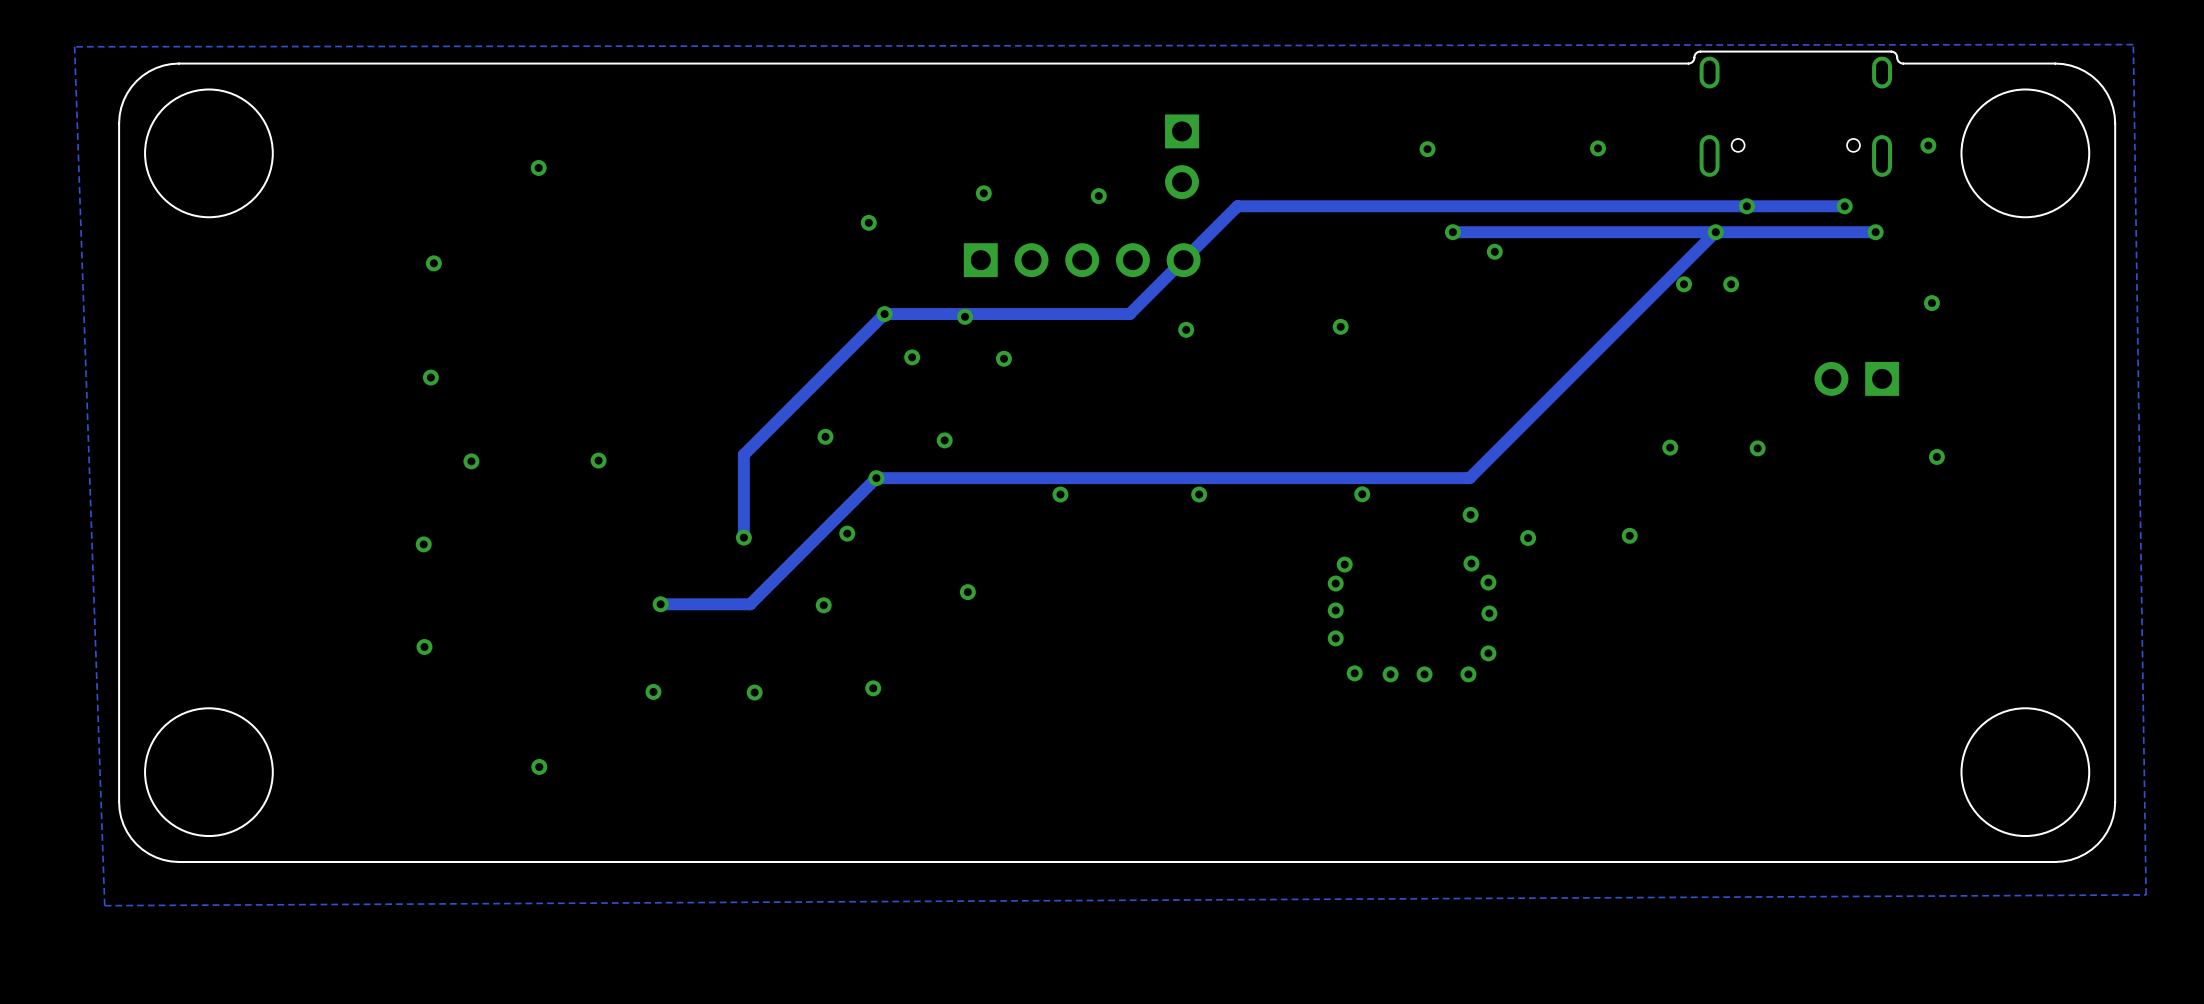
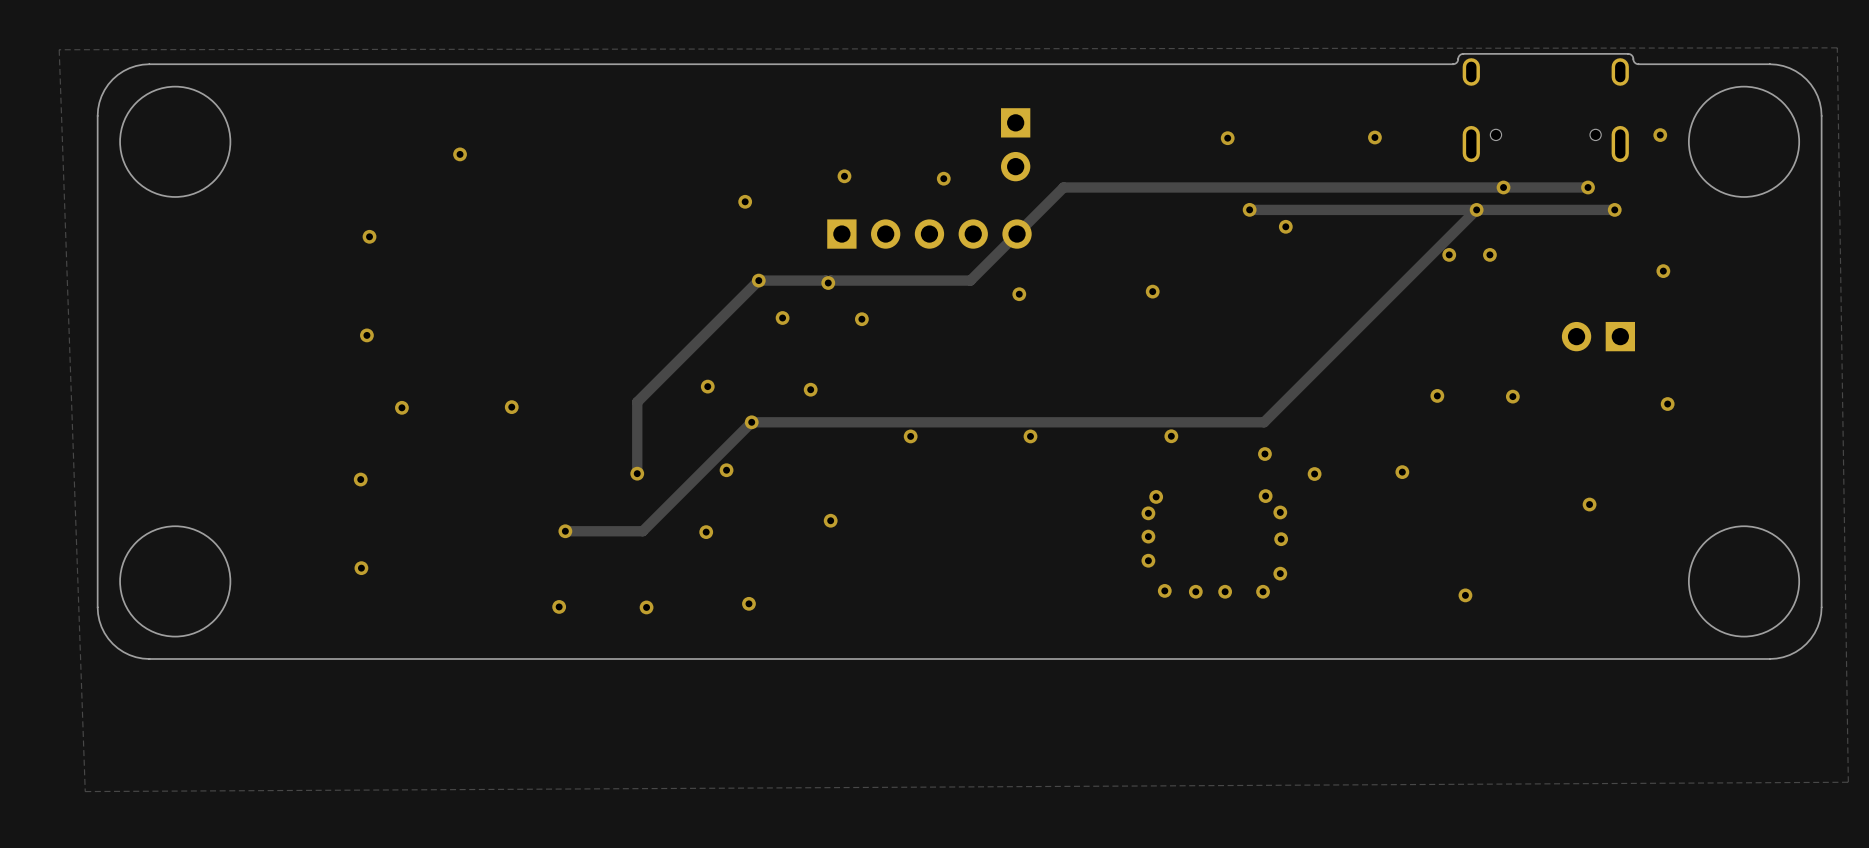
via: none -> (1589, 504)
via: none -> (1465, 595)
board edge: (2115, 692) (2115, 802) (2110, 825) (2097, 844) (2085, 853) (2070, 859) (2055, 861) (171, 861) (156, 857) (136, 844) (127, 832) (121, 817) (119, 802) (119, 692) -> (1821, 607) (1817, 627) (1806, 643) (1789, 655) (1769, 658) (149, 658) (129, 655) (112, 643) (101, 627) (97, 607)
via: (539, 766) -> none
round board edge position: (208, 772) -> (175, 581)
round board edge position: (2025, 772) -> (1744, 581)

